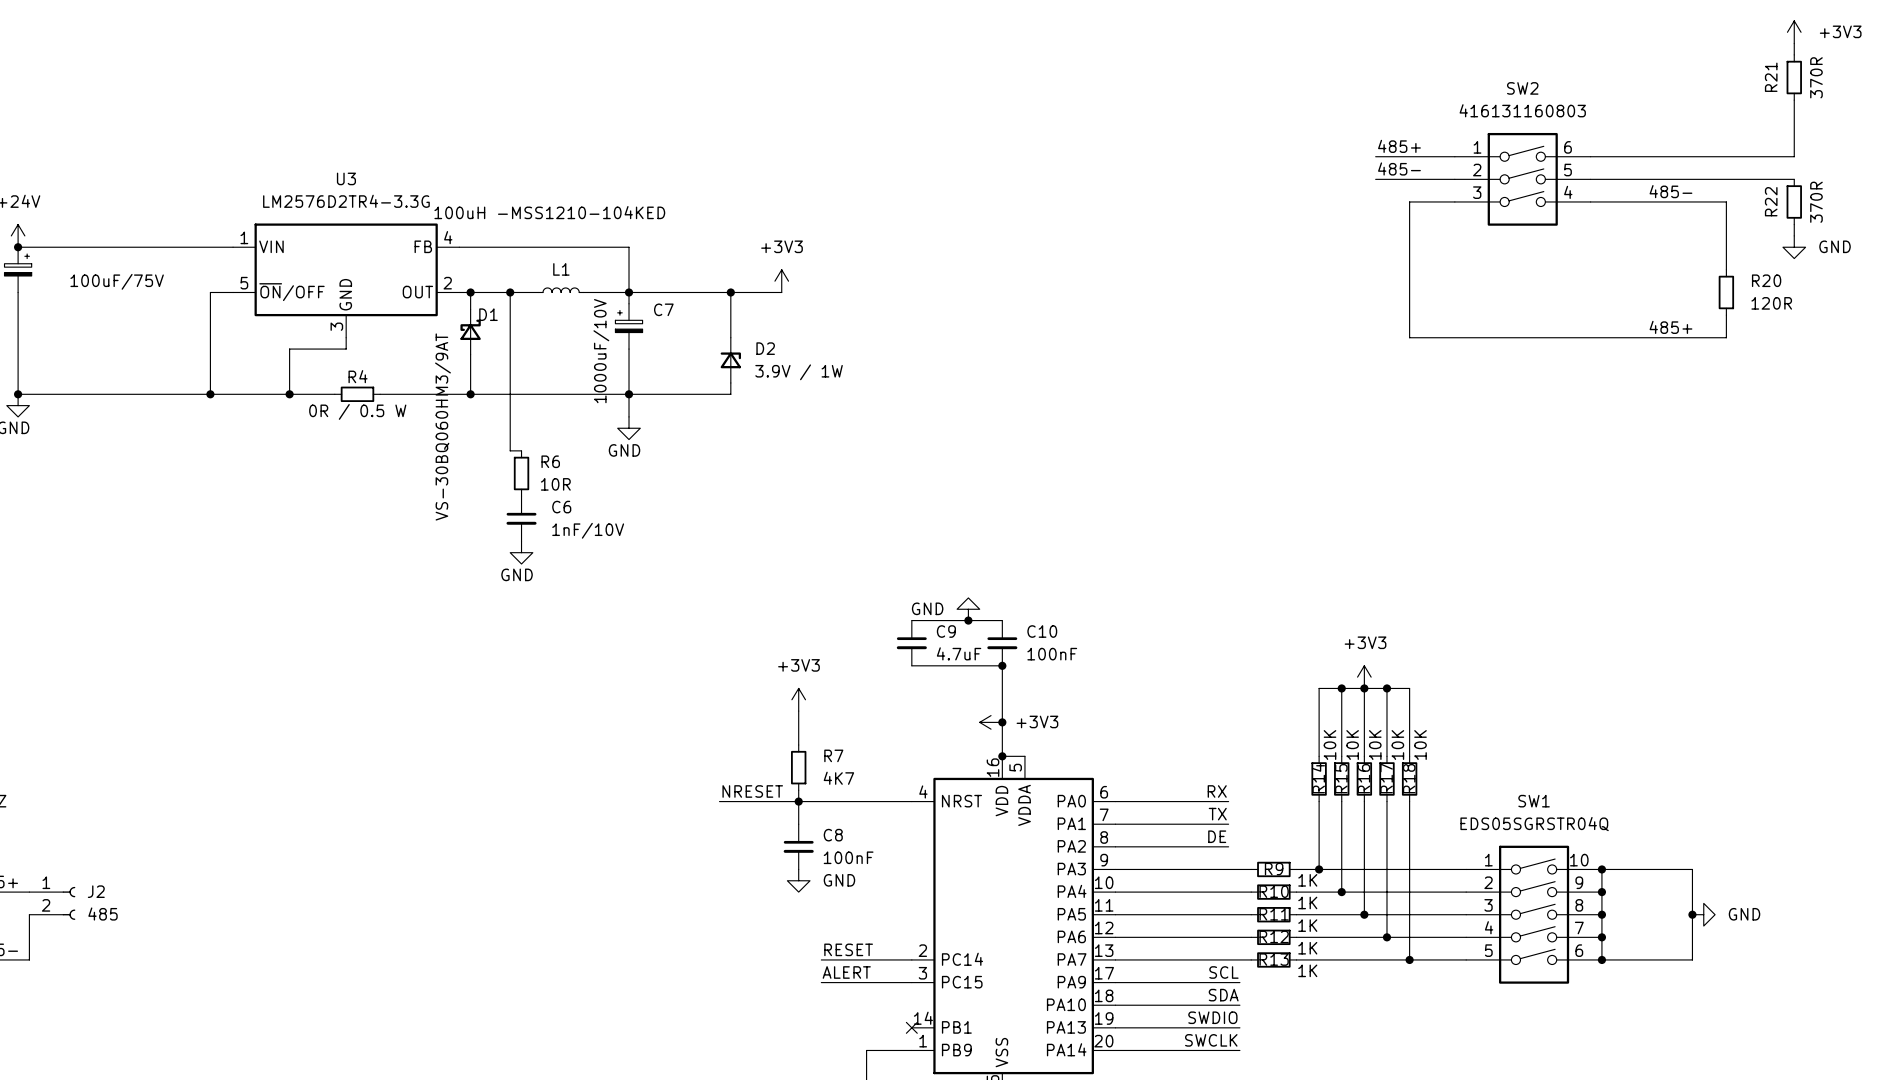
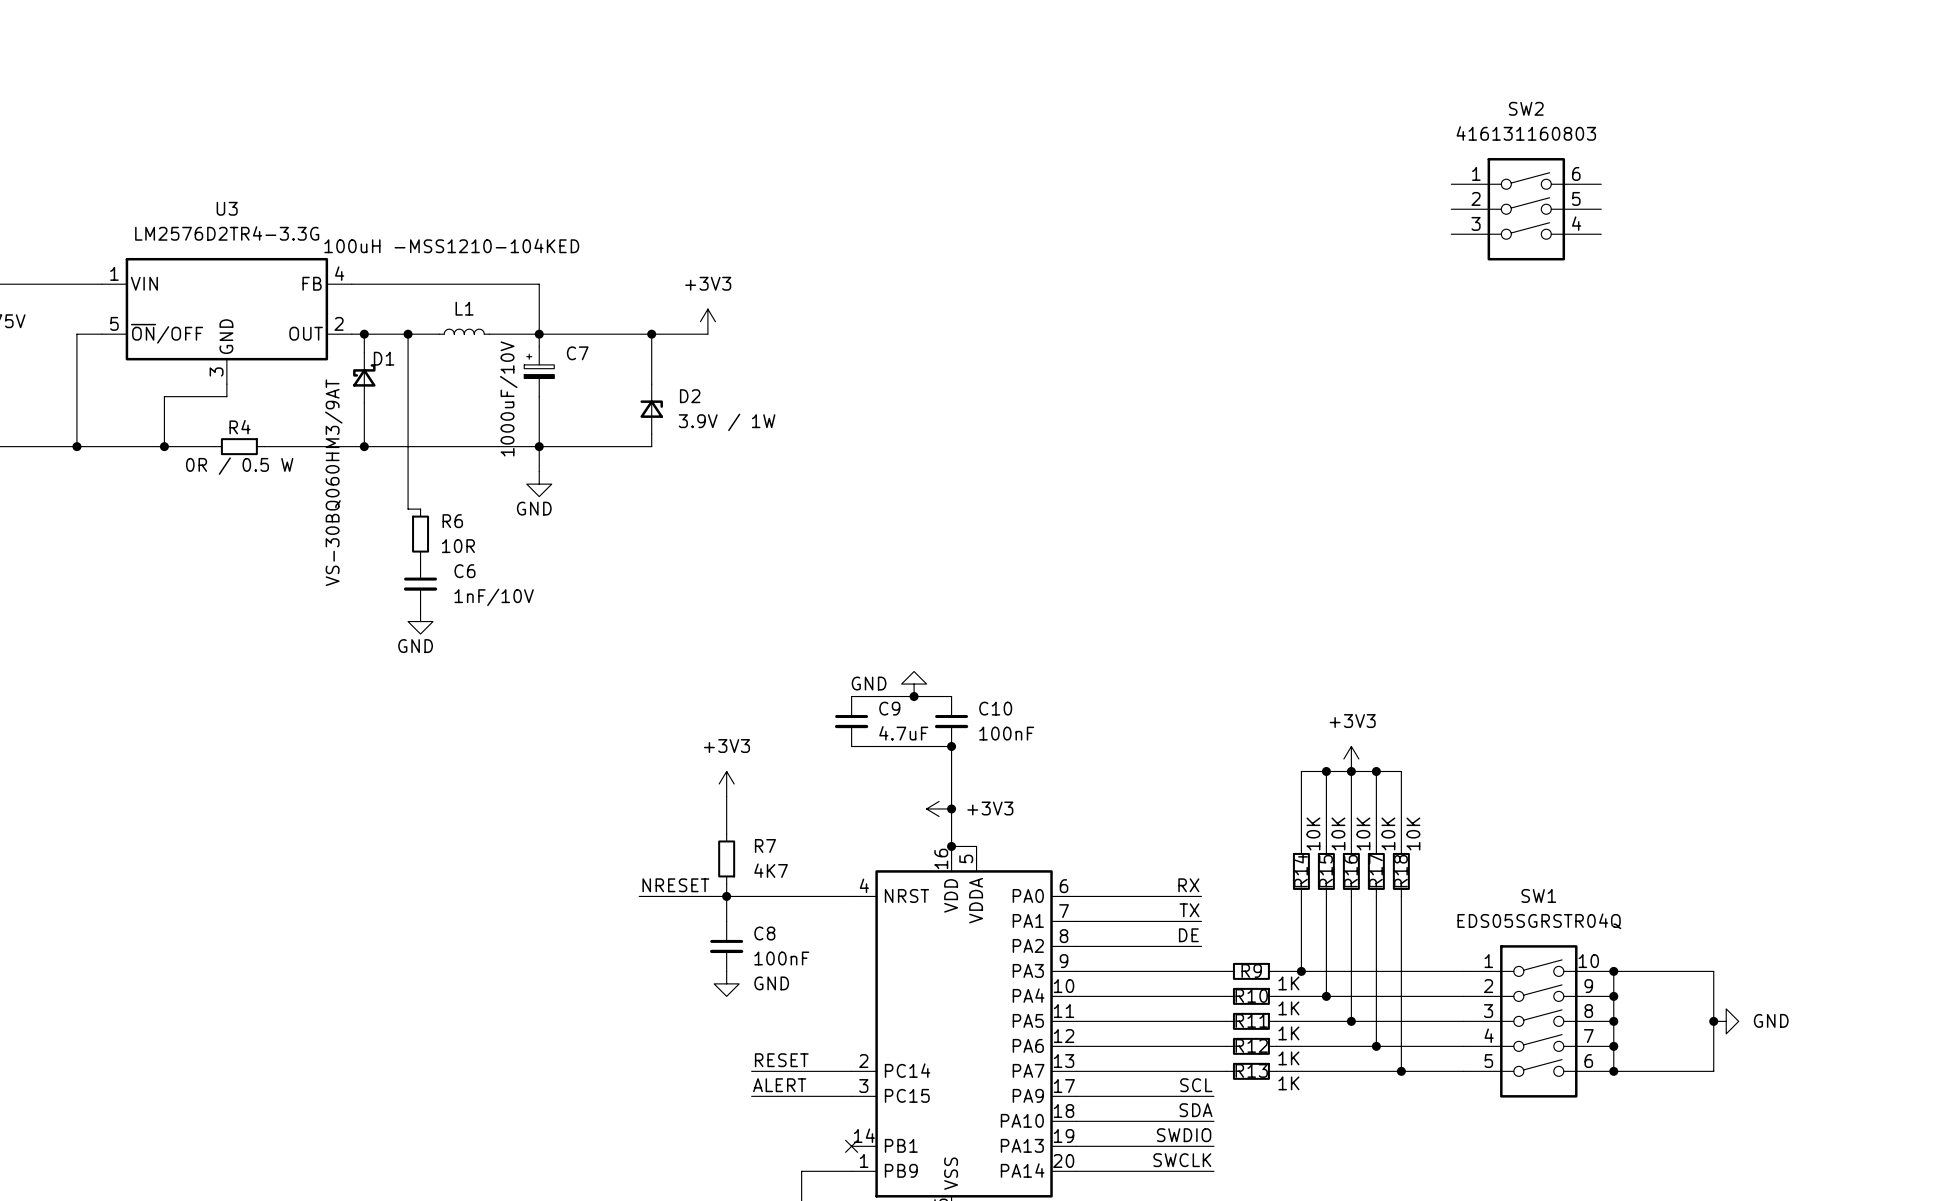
power symbol: +3V3 (1794, 32) -> none
wire: (1794, 43) (1794, 54) -> none
R21: 370R (1794, 77) -> none
wire: (1794, 100) (1794, 156) (1590, 156) -> none
label: 485+ (1399, 146) -> none
wire: (1375, 156) (1454, 156) -> none
label: 485- (1399, 168) -> none
wire: (1375, 179) (1454, 179) -> none
wire: (1590, 179) (1794, 179) -> none
label: 485- (1670, 191) -> none
wire: (1454, 201) (1409, 201) (1409, 337) (1726, 337) (1726, 315) -> none
wire: (1590, 201) (1726, 201) (1726, 269) -> none
R22: 370R (1794, 201) -> none
wire: (1794, 224) (1794, 235) -> none
power symbol: GND (1794, 247) -> none
R20: 120R (1726, 292) -> none
label: 485+ (1670, 327) -> none

